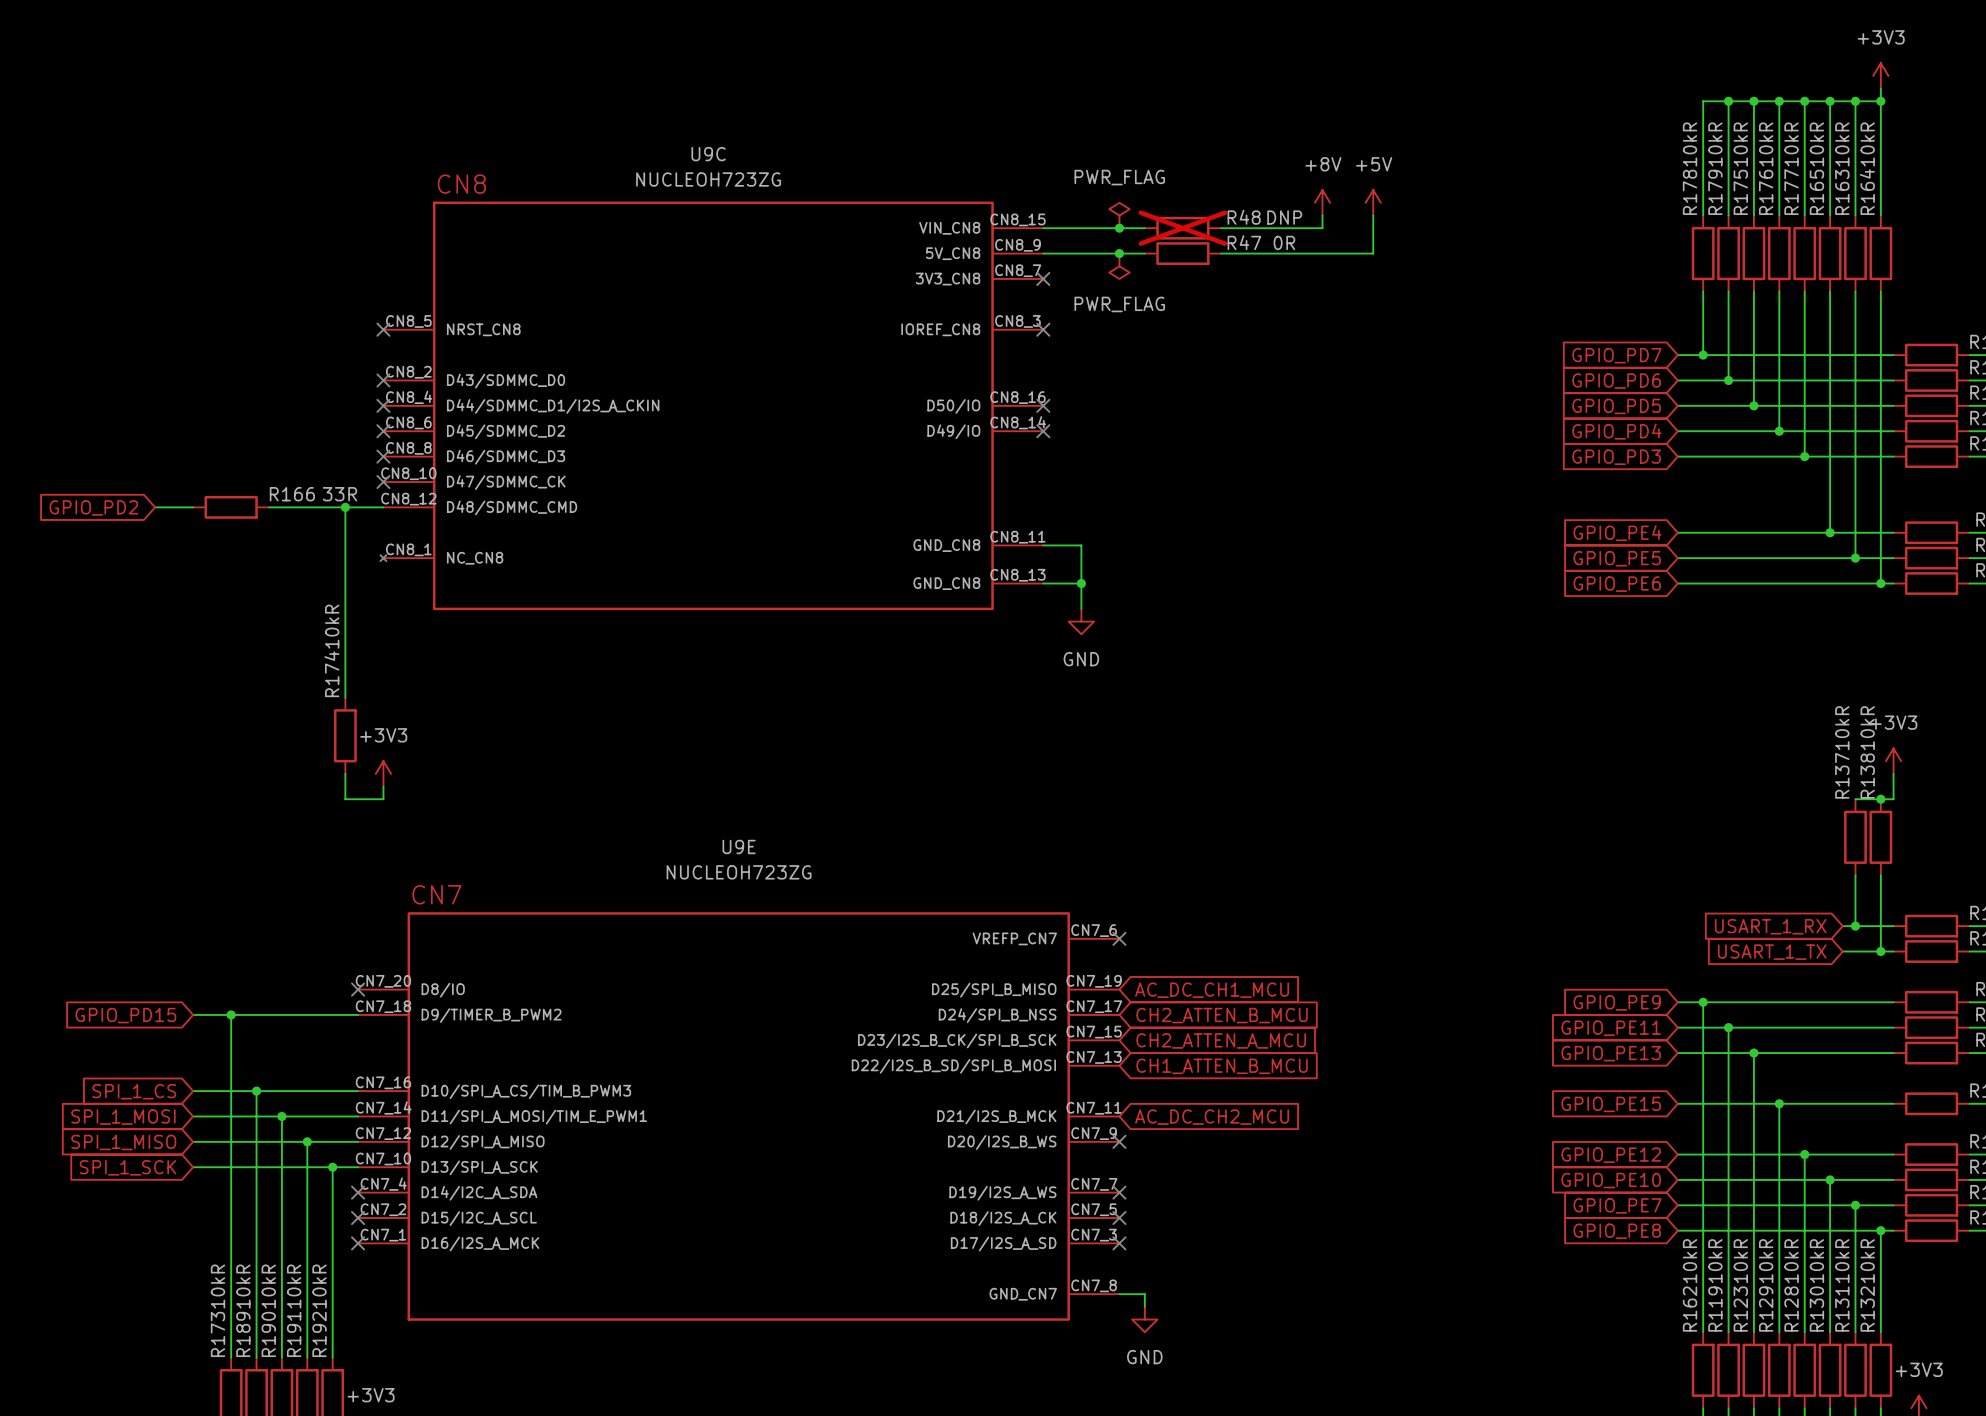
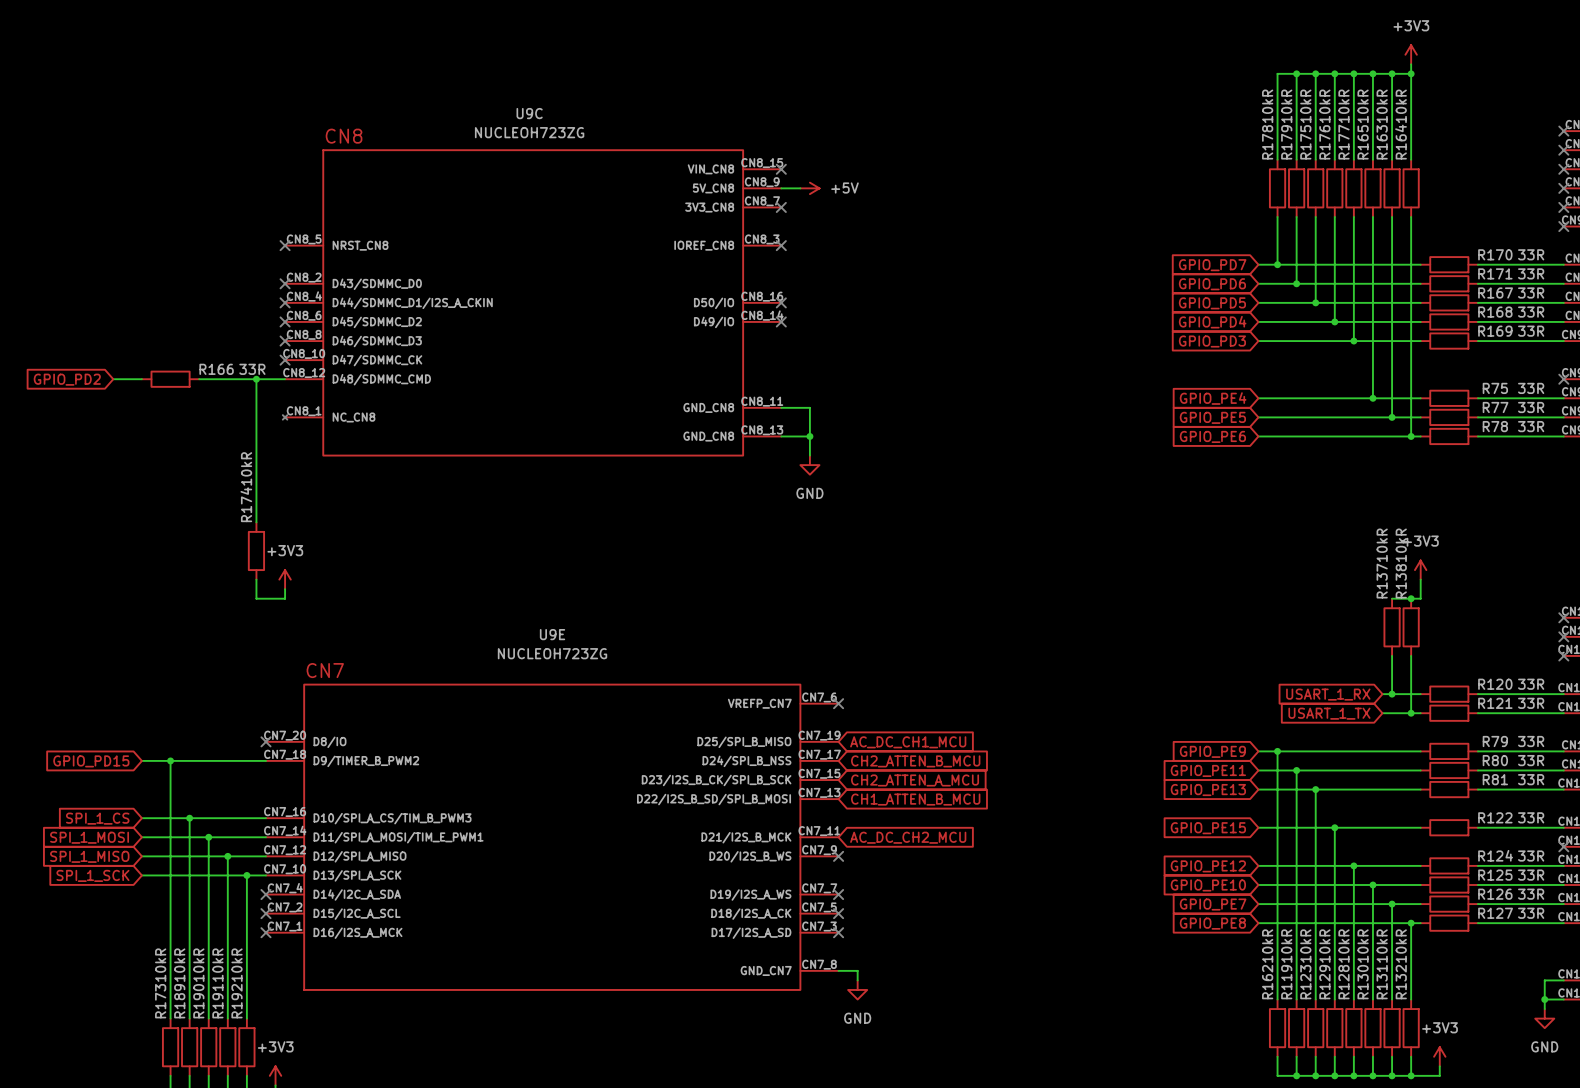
power symbol: +8V (1322, 202) -> none
power symbol: +5V (1373, 202) -> none
power symbol: PWR_FLAG (1119, 215) -> none
wire: (1322, 215) (1322, 228) (1220, 228) -> none
wire: (1373, 215) (1373, 253) (1220, 253) -> none
wire: (1043, 228) (1144, 228) -> none
no-connect mark: none -> (781, 169)
junction: (1119, 228) -> none
R48: DNP (1182, 228) -> none
wire: (1068, 253) (1144, 253) -> none
power symbol: none -> +5V (809, 188)
junction: (1119, 253) -> none
R47: 0R (1182, 253) -> none
power symbol: PWR_FLAG (1119, 266) -> none

